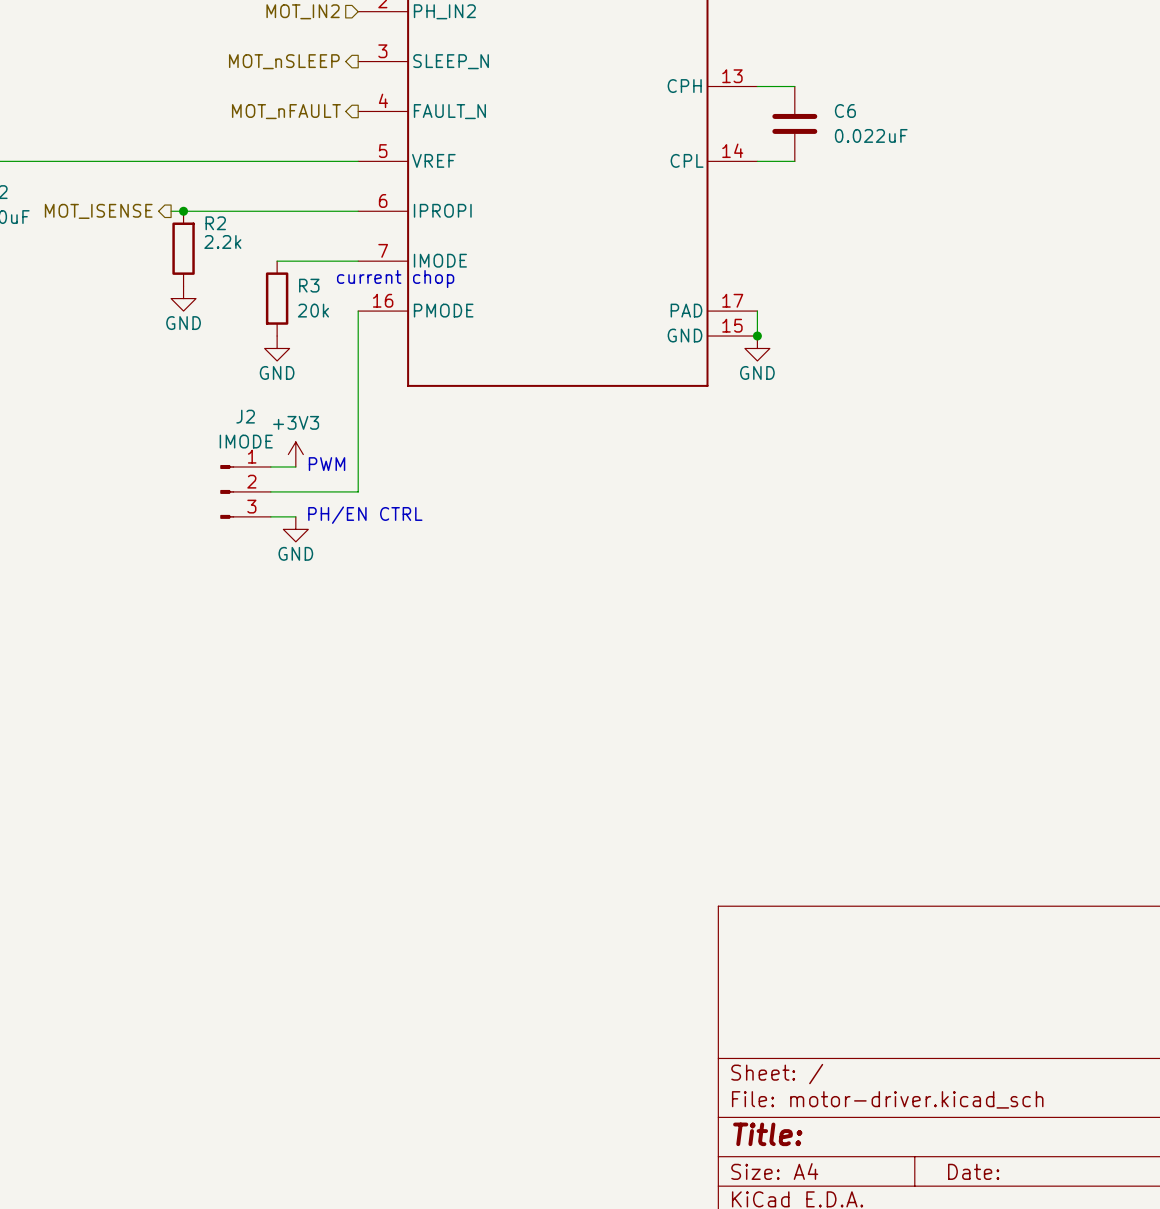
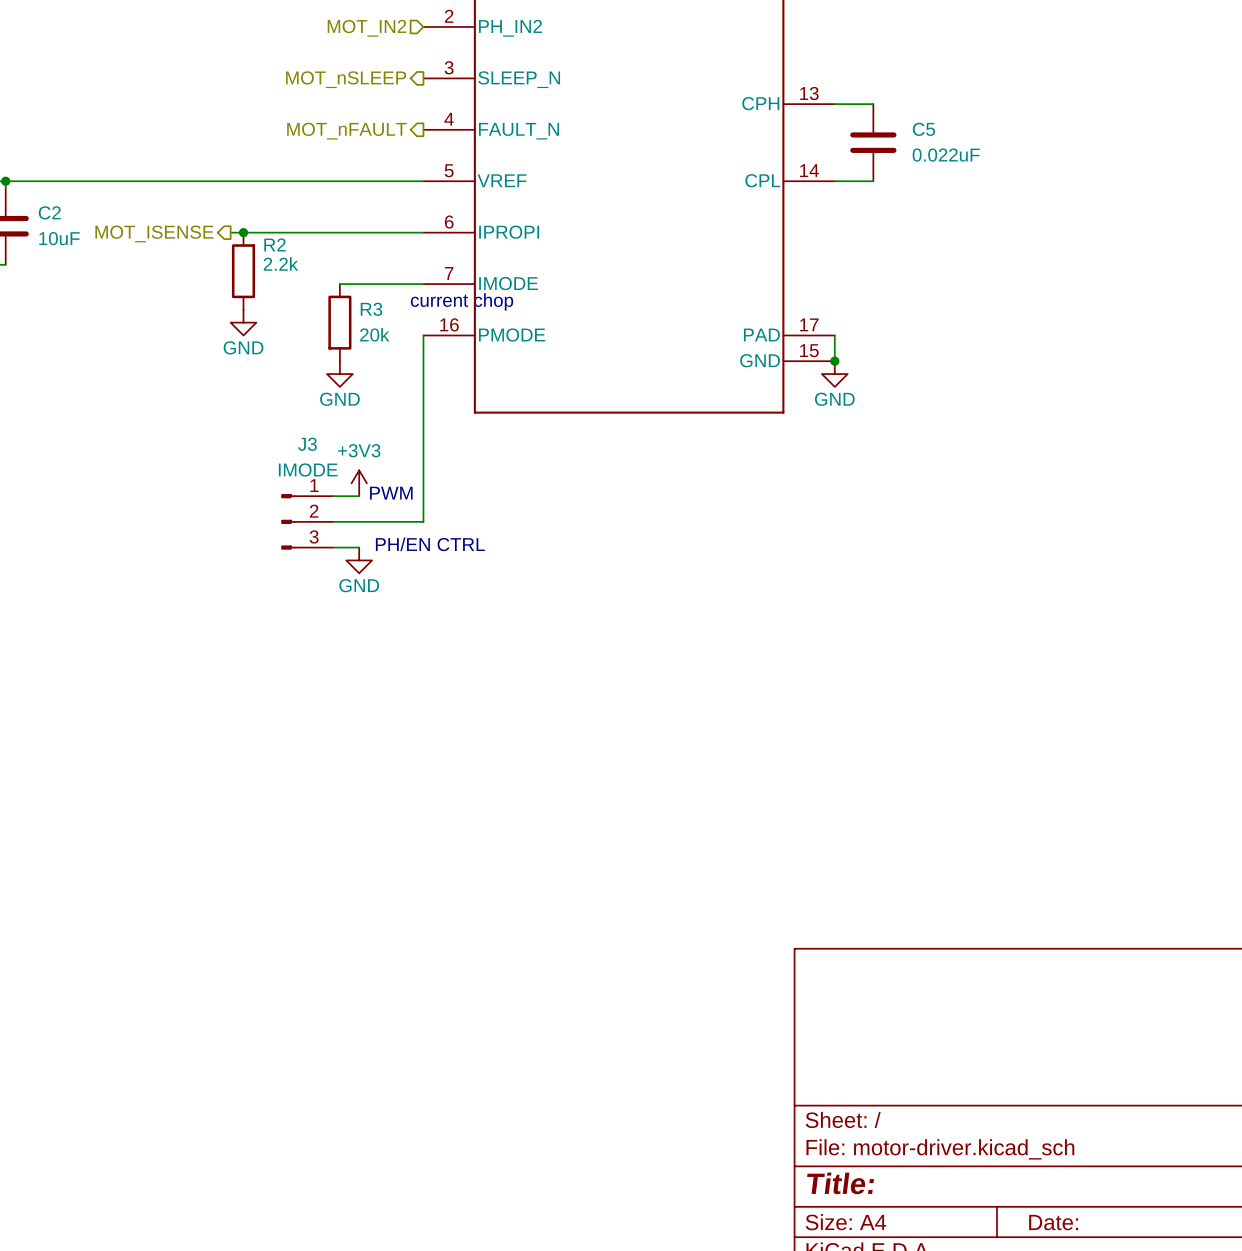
C6 name: C6 (845, 110) -> C5 (923, 129)
J2 name: J2 (245, 416) -> J3 (307, 444)

